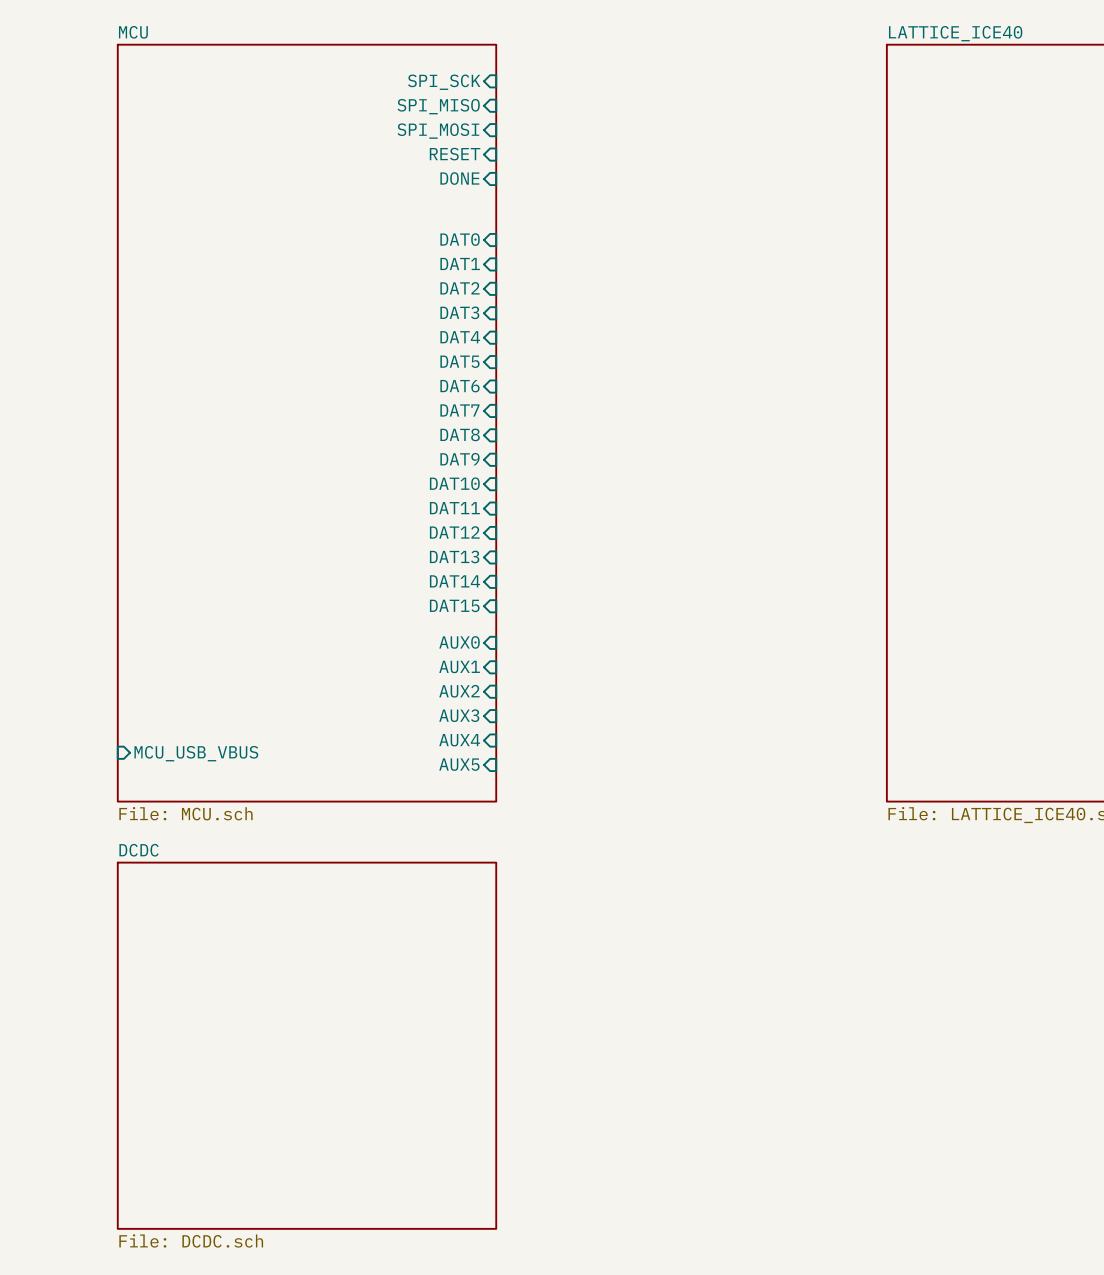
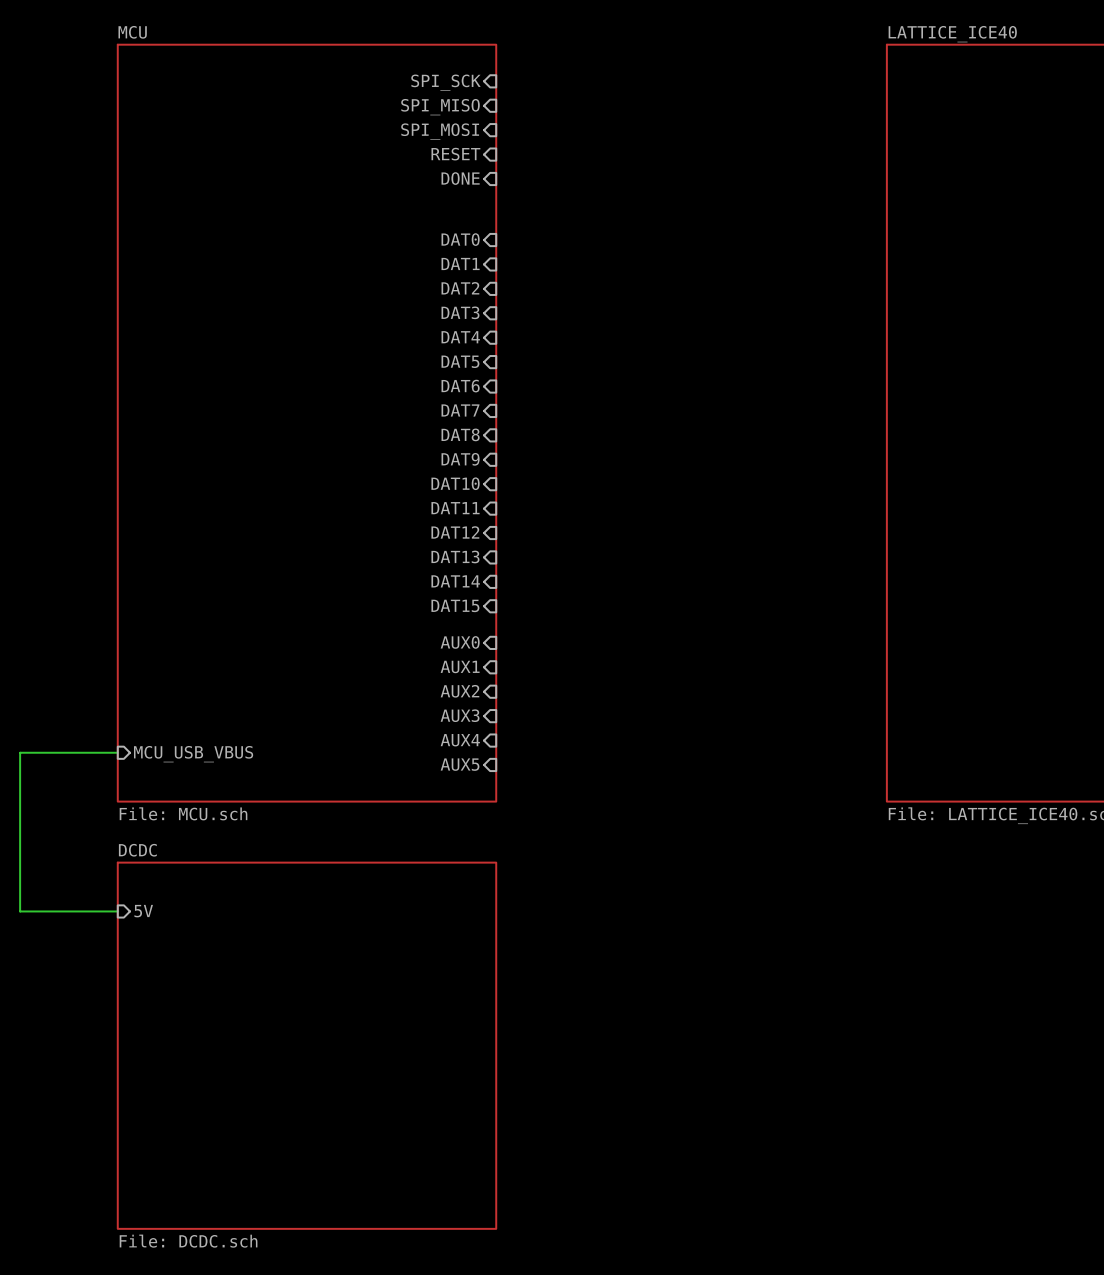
wire: none -> (117, 752) (20, 752) (20, 911) (117, 911)
sheet pin: none -> 5V (143, 911)

